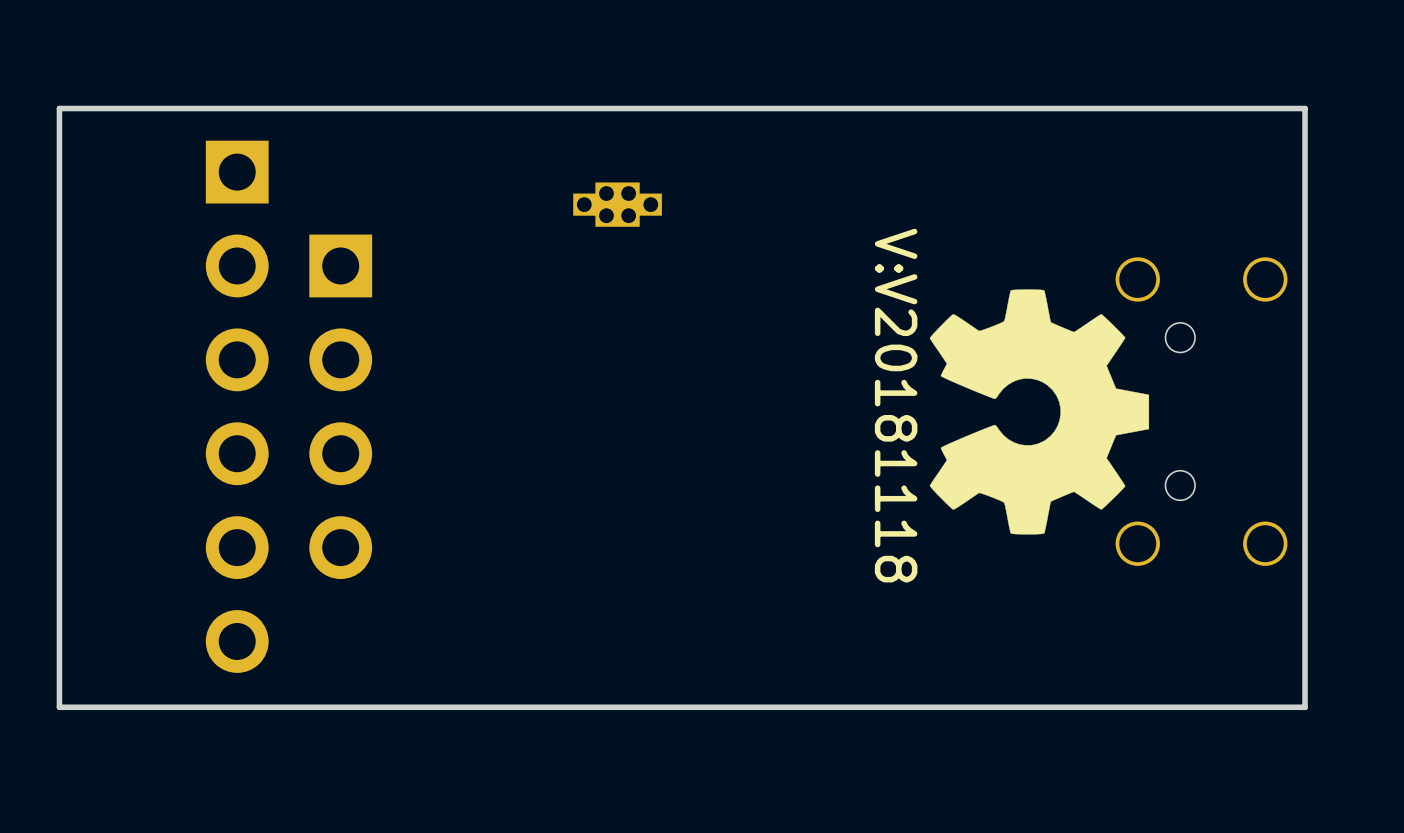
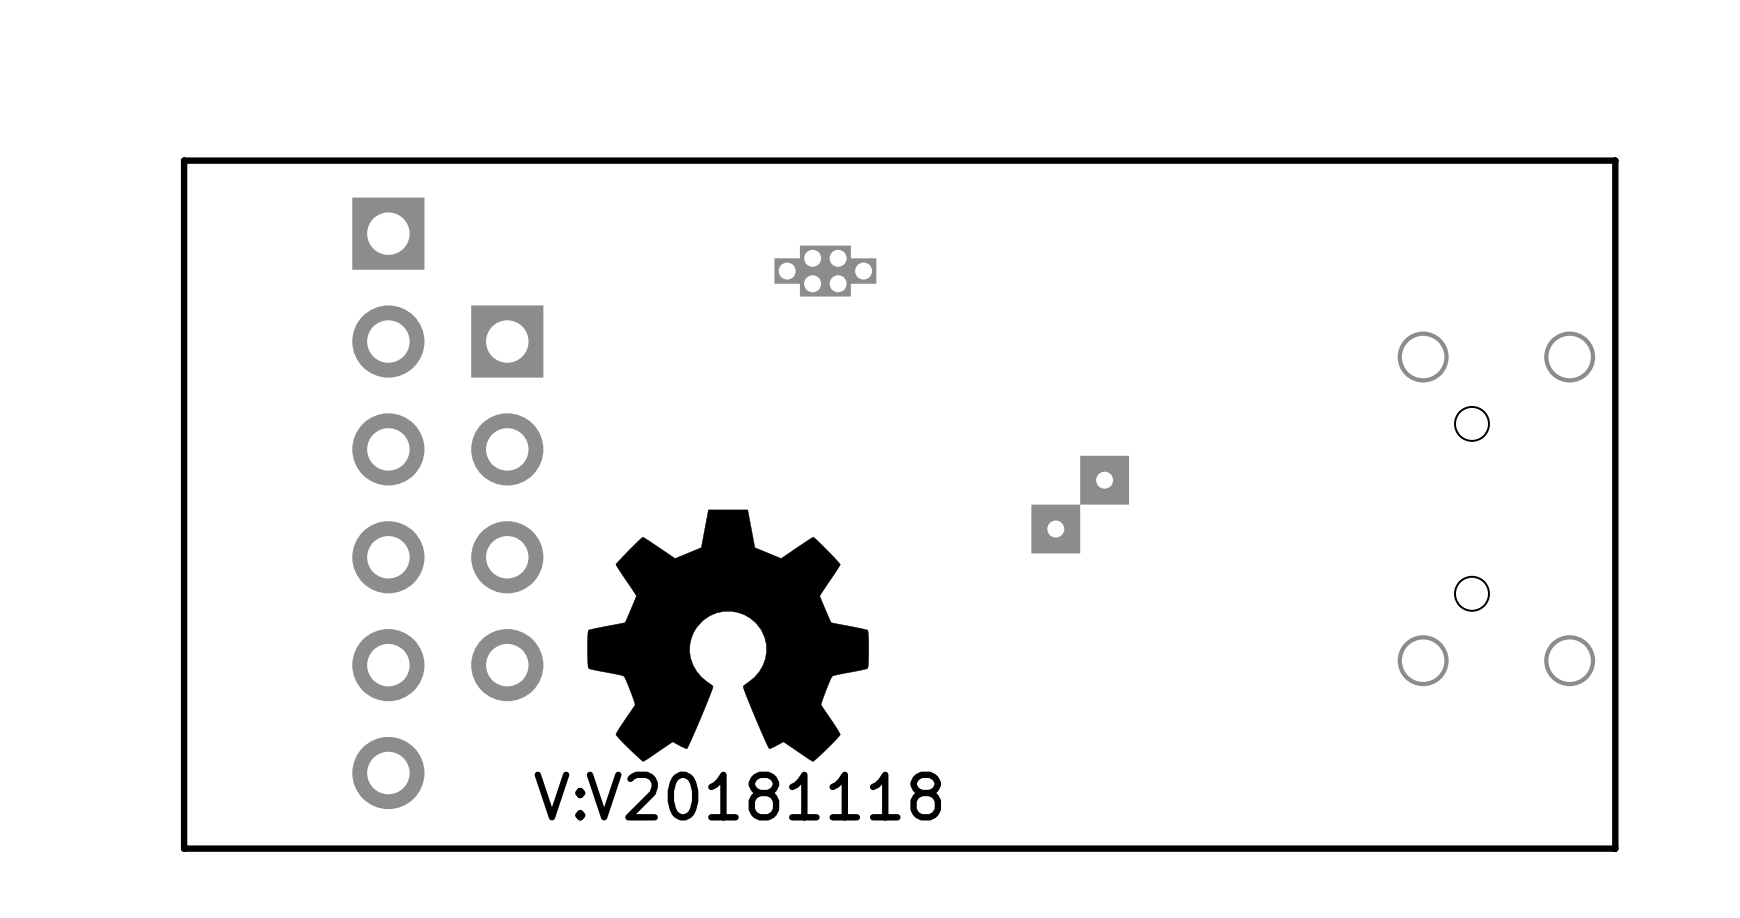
drawing: [929, 289, 1150, 535] -> none
part: none -> (1080, 504)
drawing: none -> [587, 509, 869, 762]

